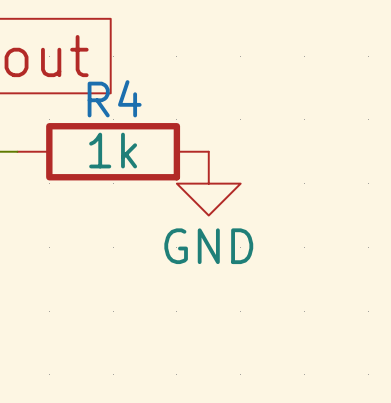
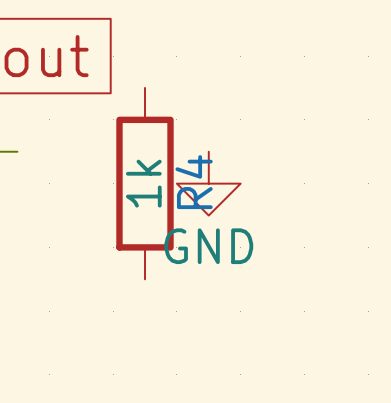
R4 rotation: 0° (113, 151) -> 90° clockwise (144, 183)

